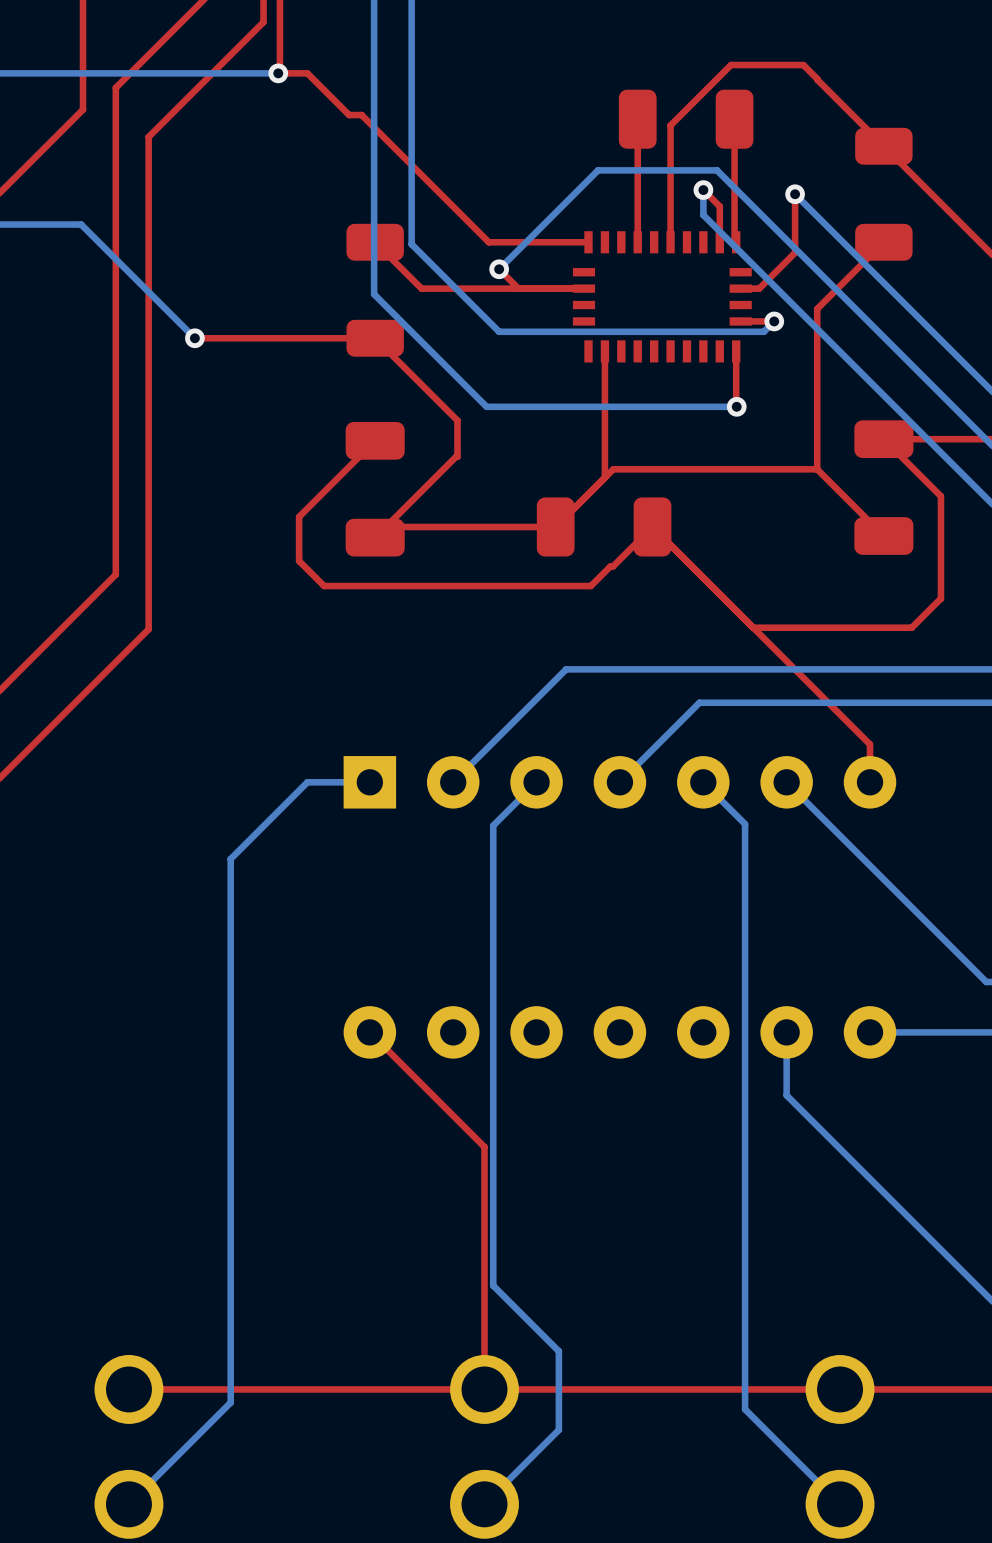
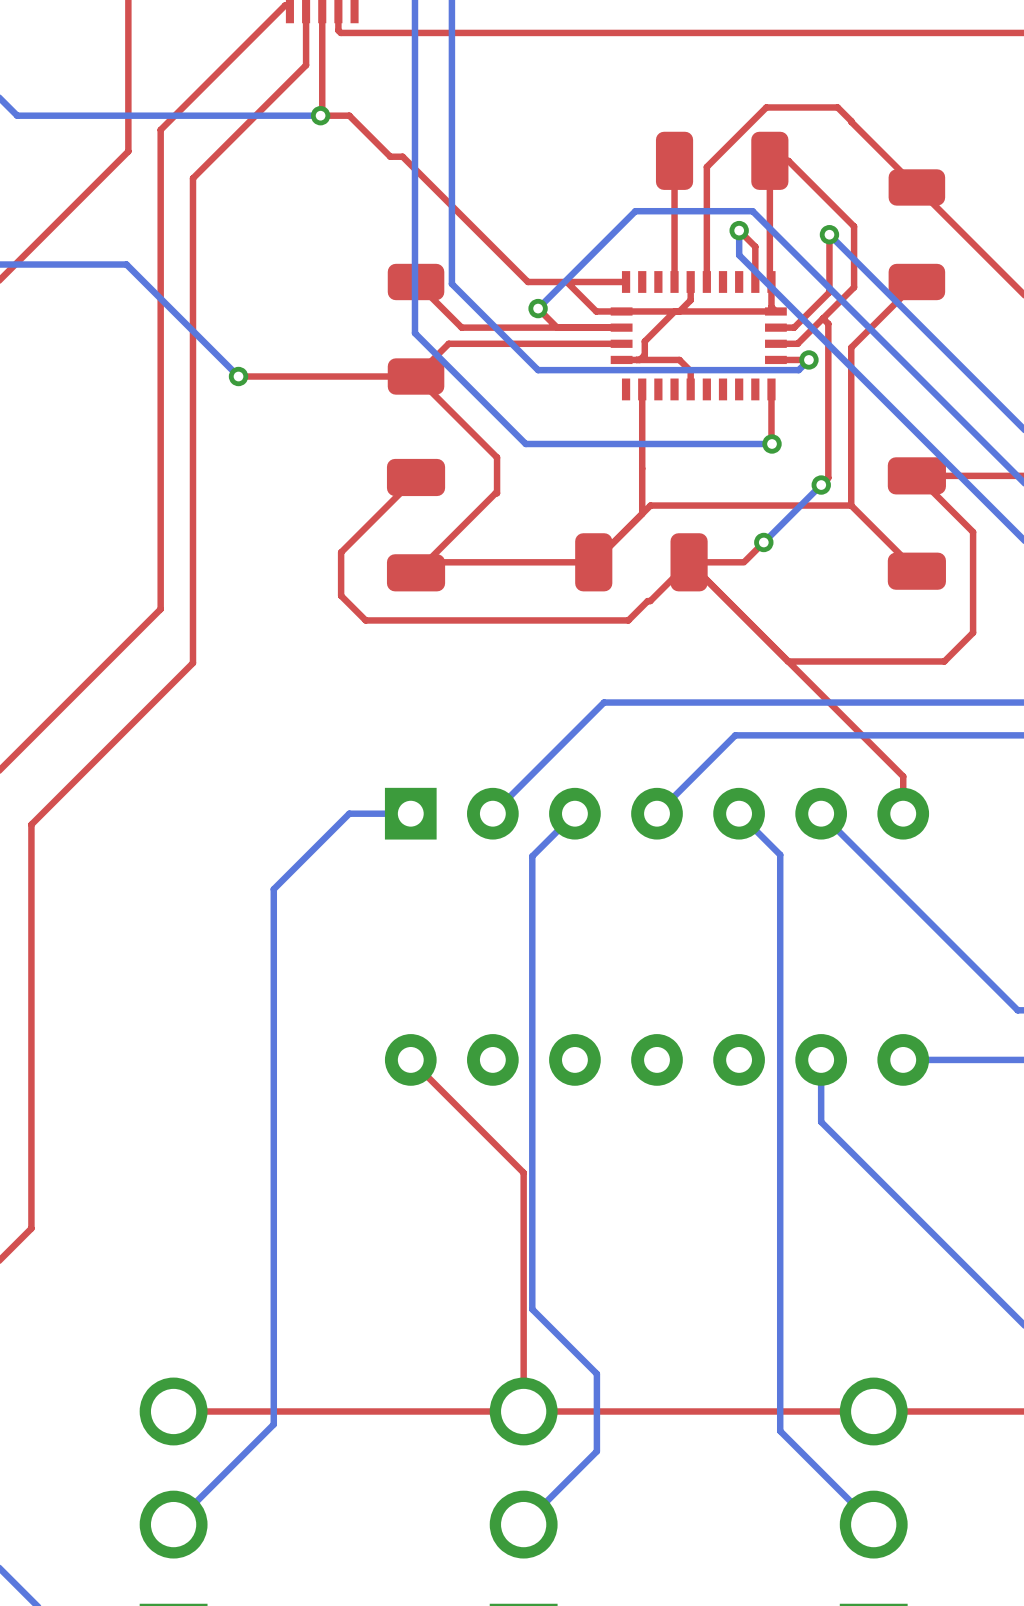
top track: none -> (769, 160) (788, 160) (854, 226) (854, 287) (797, 343) (775, 343)
top track: none -> (566, 281) (596, 311) (777, 311)
top track: none -> (690, 281) (690, 300) (679, 311)
top track: none -> (771, 281) (771, 307) (775, 311)
top track: none -> (674, 311) (644, 341) (644, 355) (639, 359)
top track: none -> (822, 318) (828, 323) (828, 477) (821, 485)
top track: none -> (621, 343) (448, 343) (416, 376)
top track: none -> (621, 359) (679, 359) (690, 371) (690, 389)
bottom track: none -> (821, 485) (763, 542)
via: none -> (821, 485)
via: none -> (763, 542)
top track: none -> (759, 546) (745, 560)
top track: none -> (743, 562) (689, 562)

